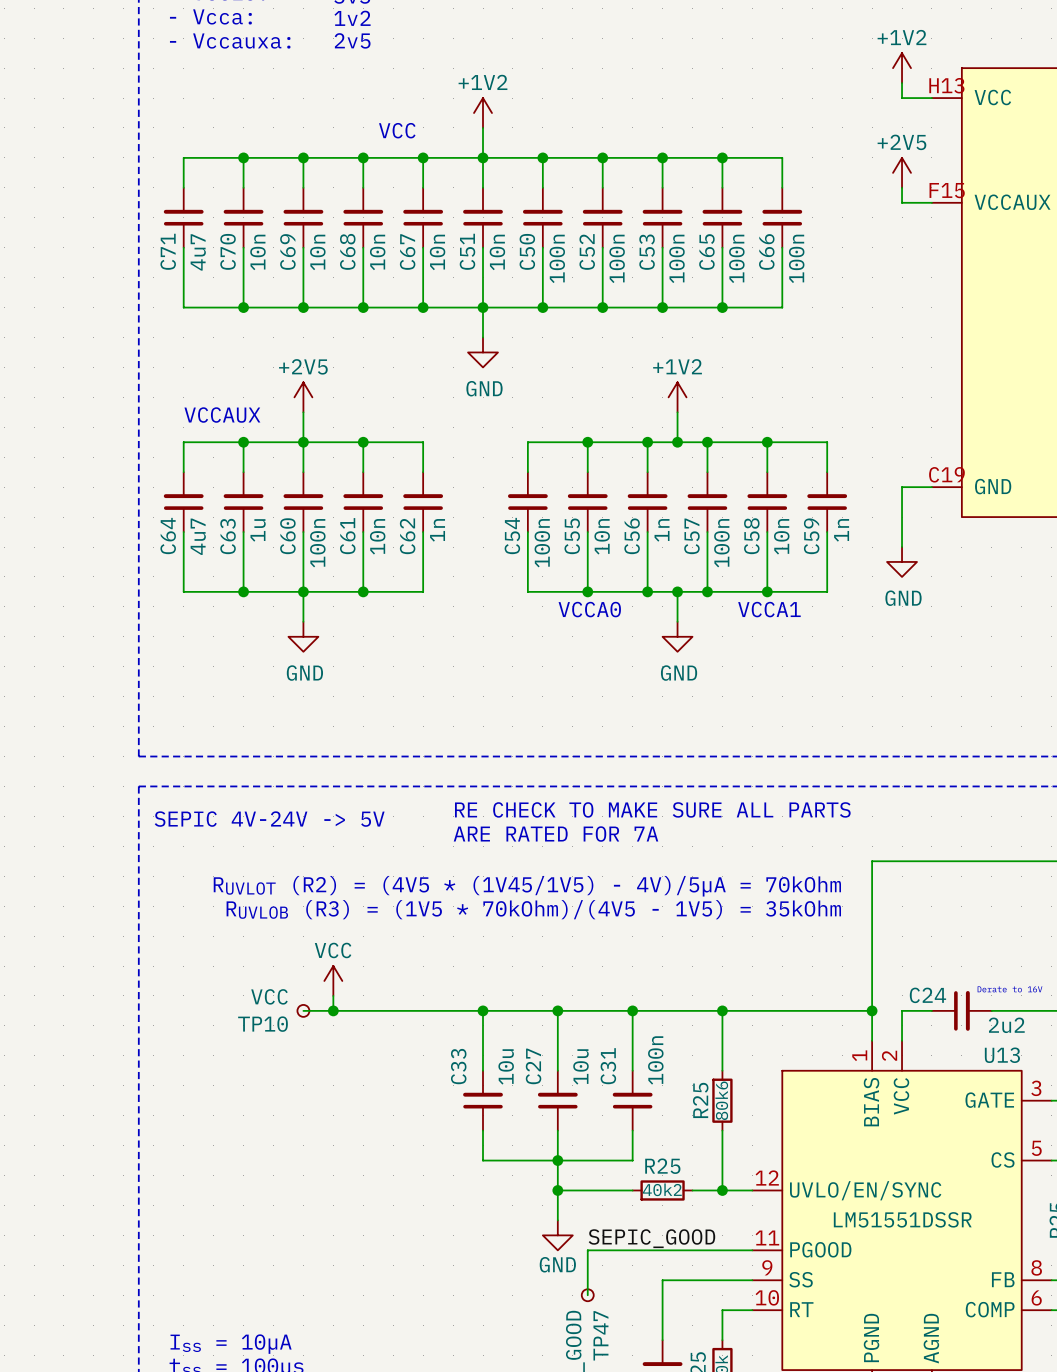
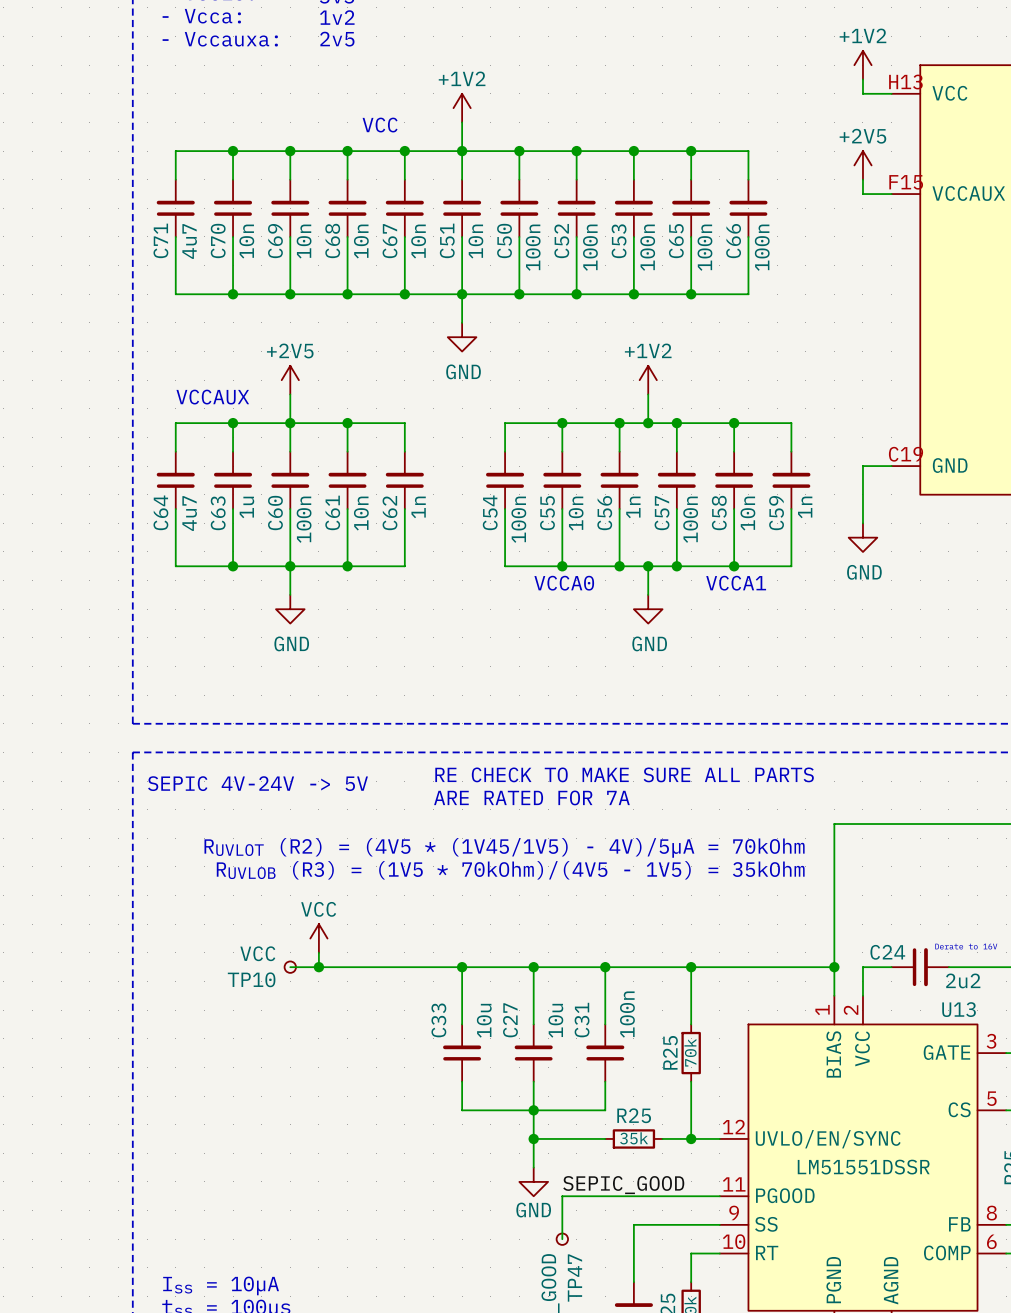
R25 value: 80k6 (721, 1100) -> 70k (690, 1052)
R25 value: 40k2 (662, 1189) -> 35k (634, 1138)

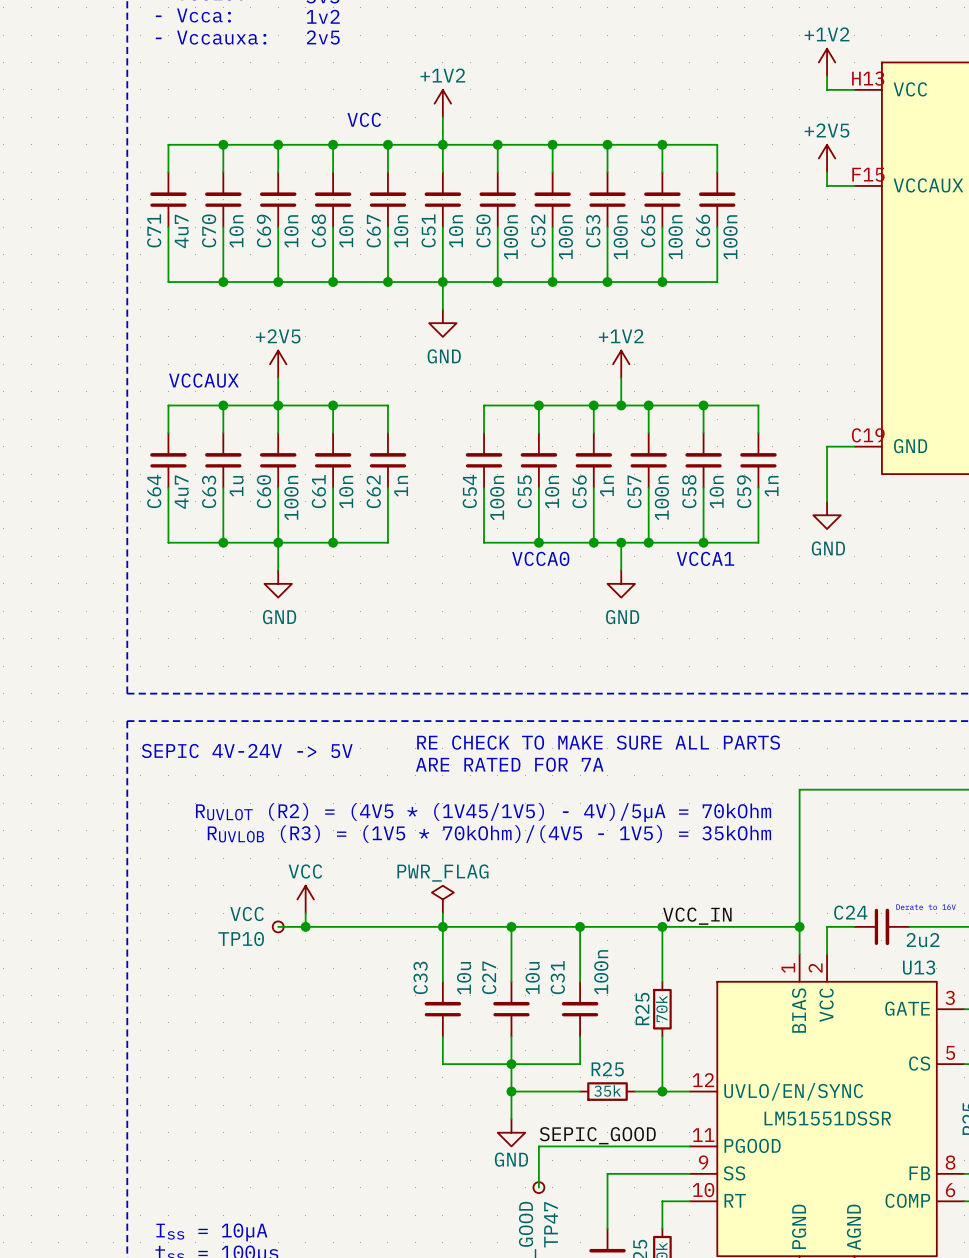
power symbol: none -> PWR_FLAG (442, 899)
wire: none -> (442, 913) (442, 926)
label: none -> VCC_IN (697, 916)

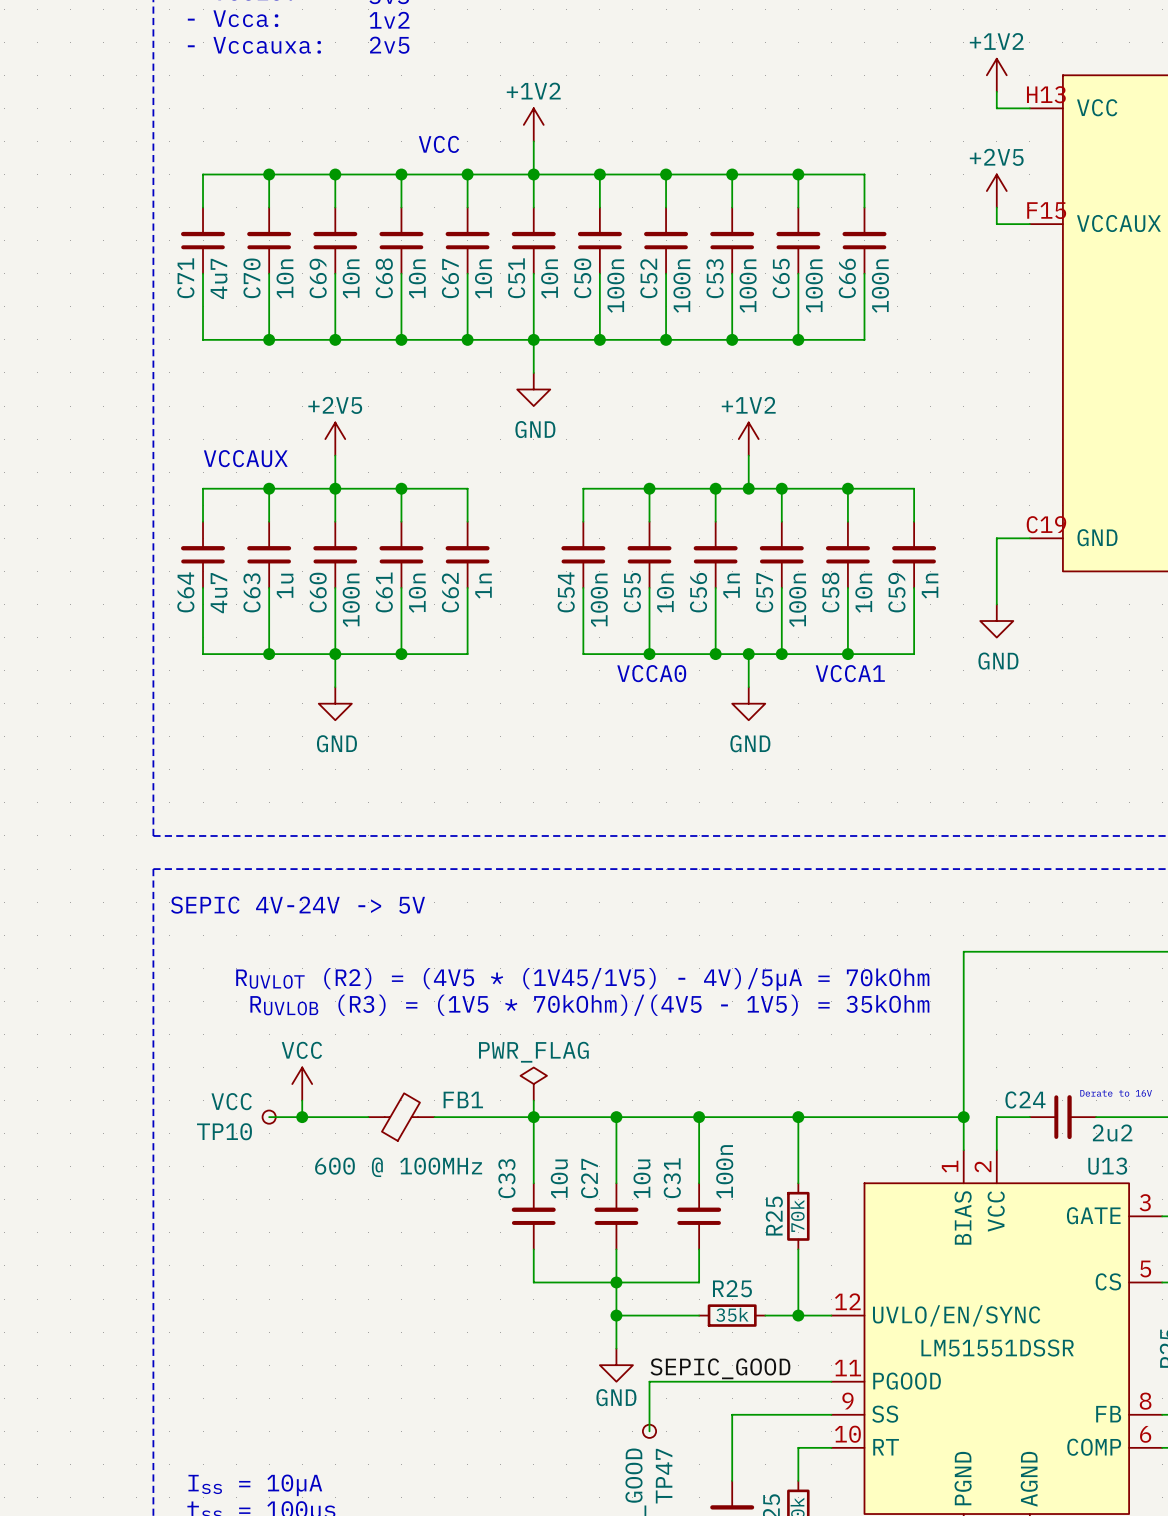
text: RE CHECK TO MAKE SURE ALL PARTS (598, 742) -> none
text: ARE RATED FOR 7A (509, 764) -> none
power symbol position: VCC (305, 899) -> VCC (302, 1084)
wire: none -> (302, 1100) (302, 1117)
wire: (305, 913) (305, 926) (360, 926) -> none
label: VCC_IN (697, 916) -> none
wire: none -> (269, 1117) (335, 1117)
TP10 position: (278, 926) -> (269, 1117)
junction position: (305, 926) -> (302, 1117)
FB1: none -> 600 @ 100MHz (401, 1117)

